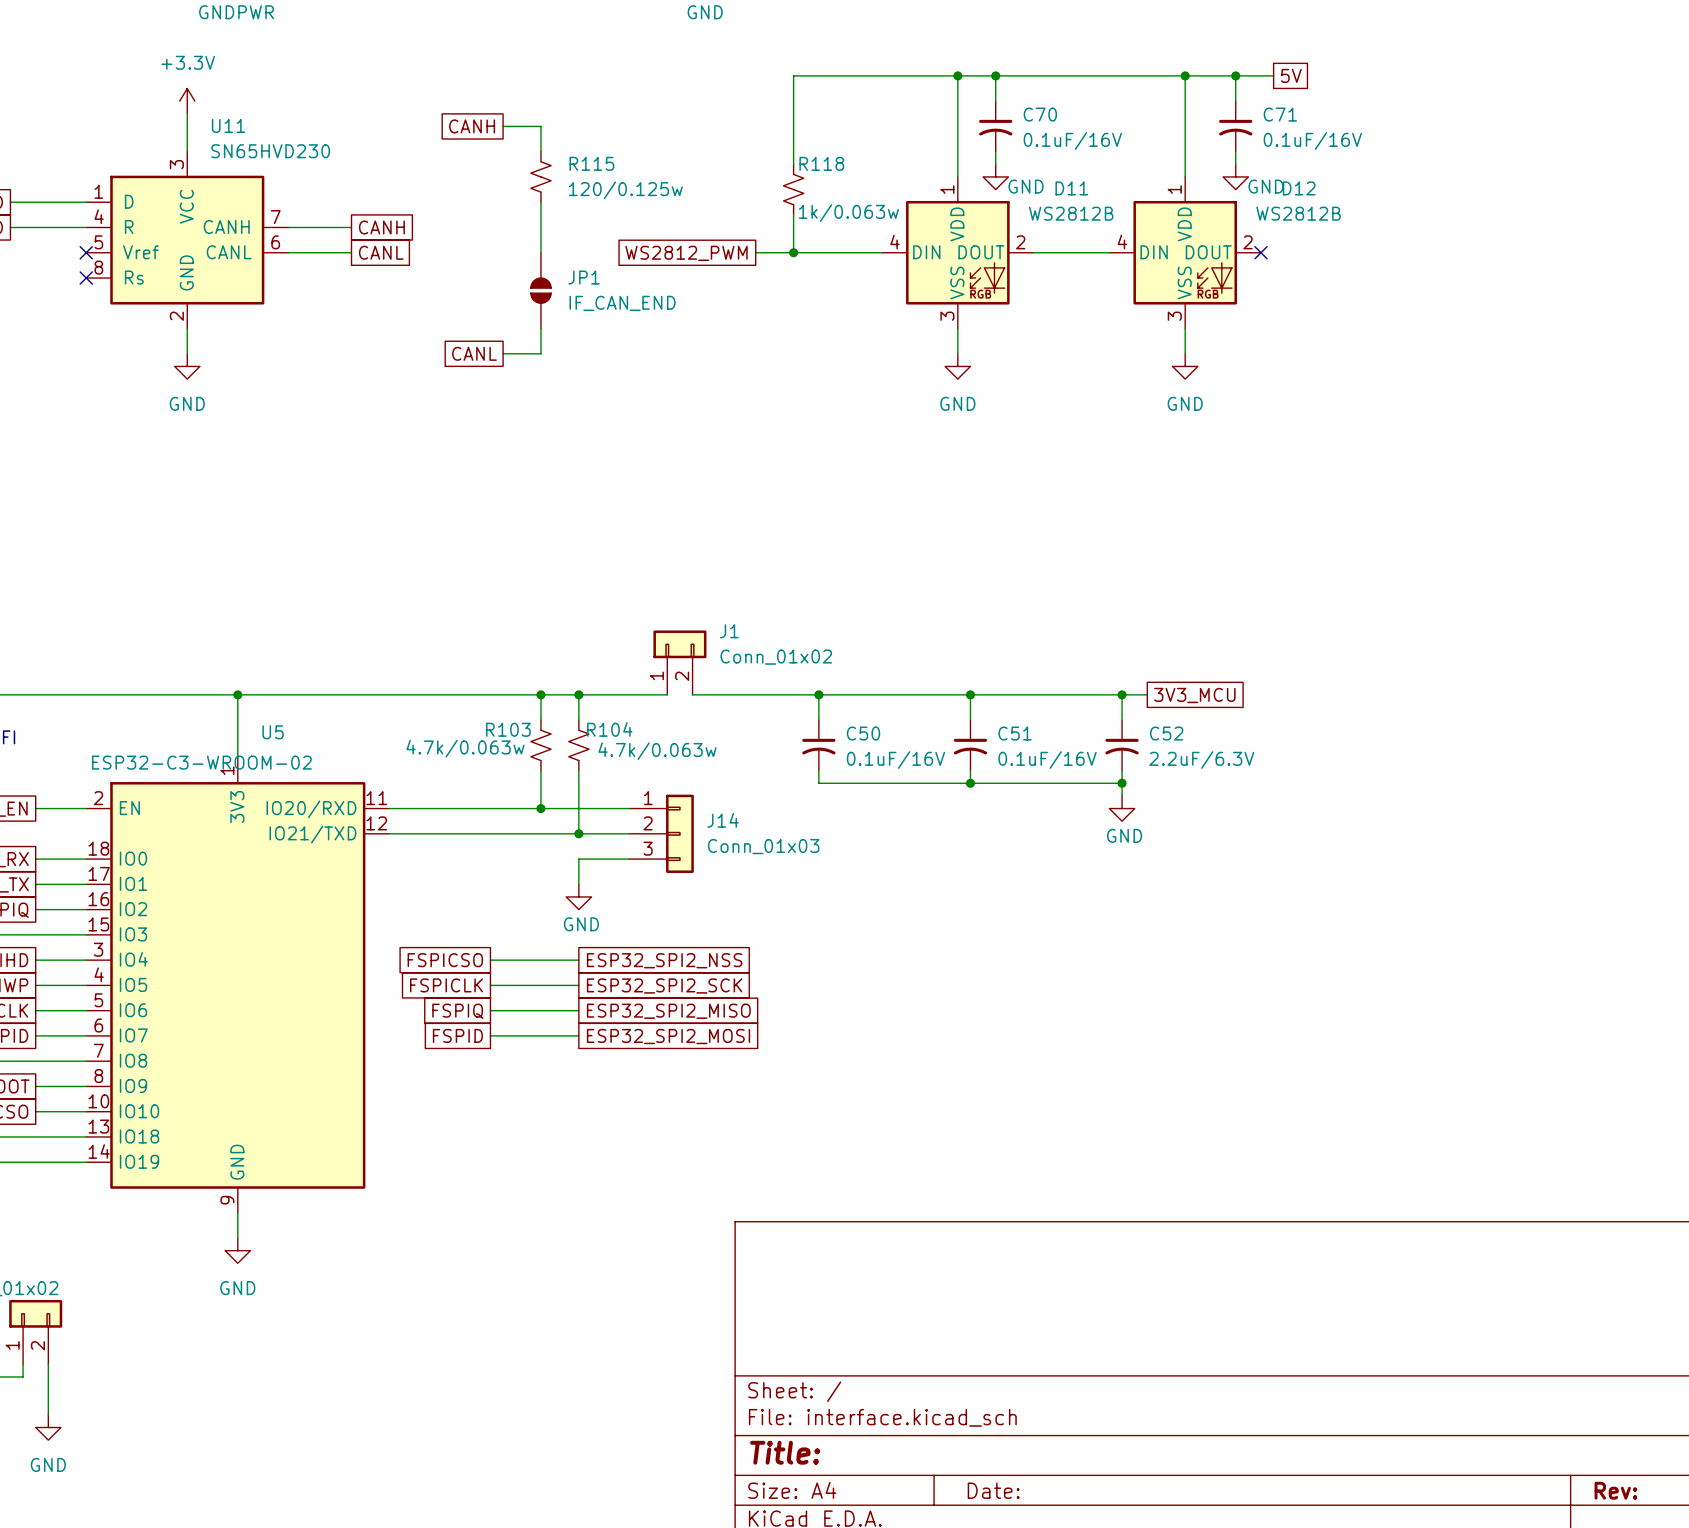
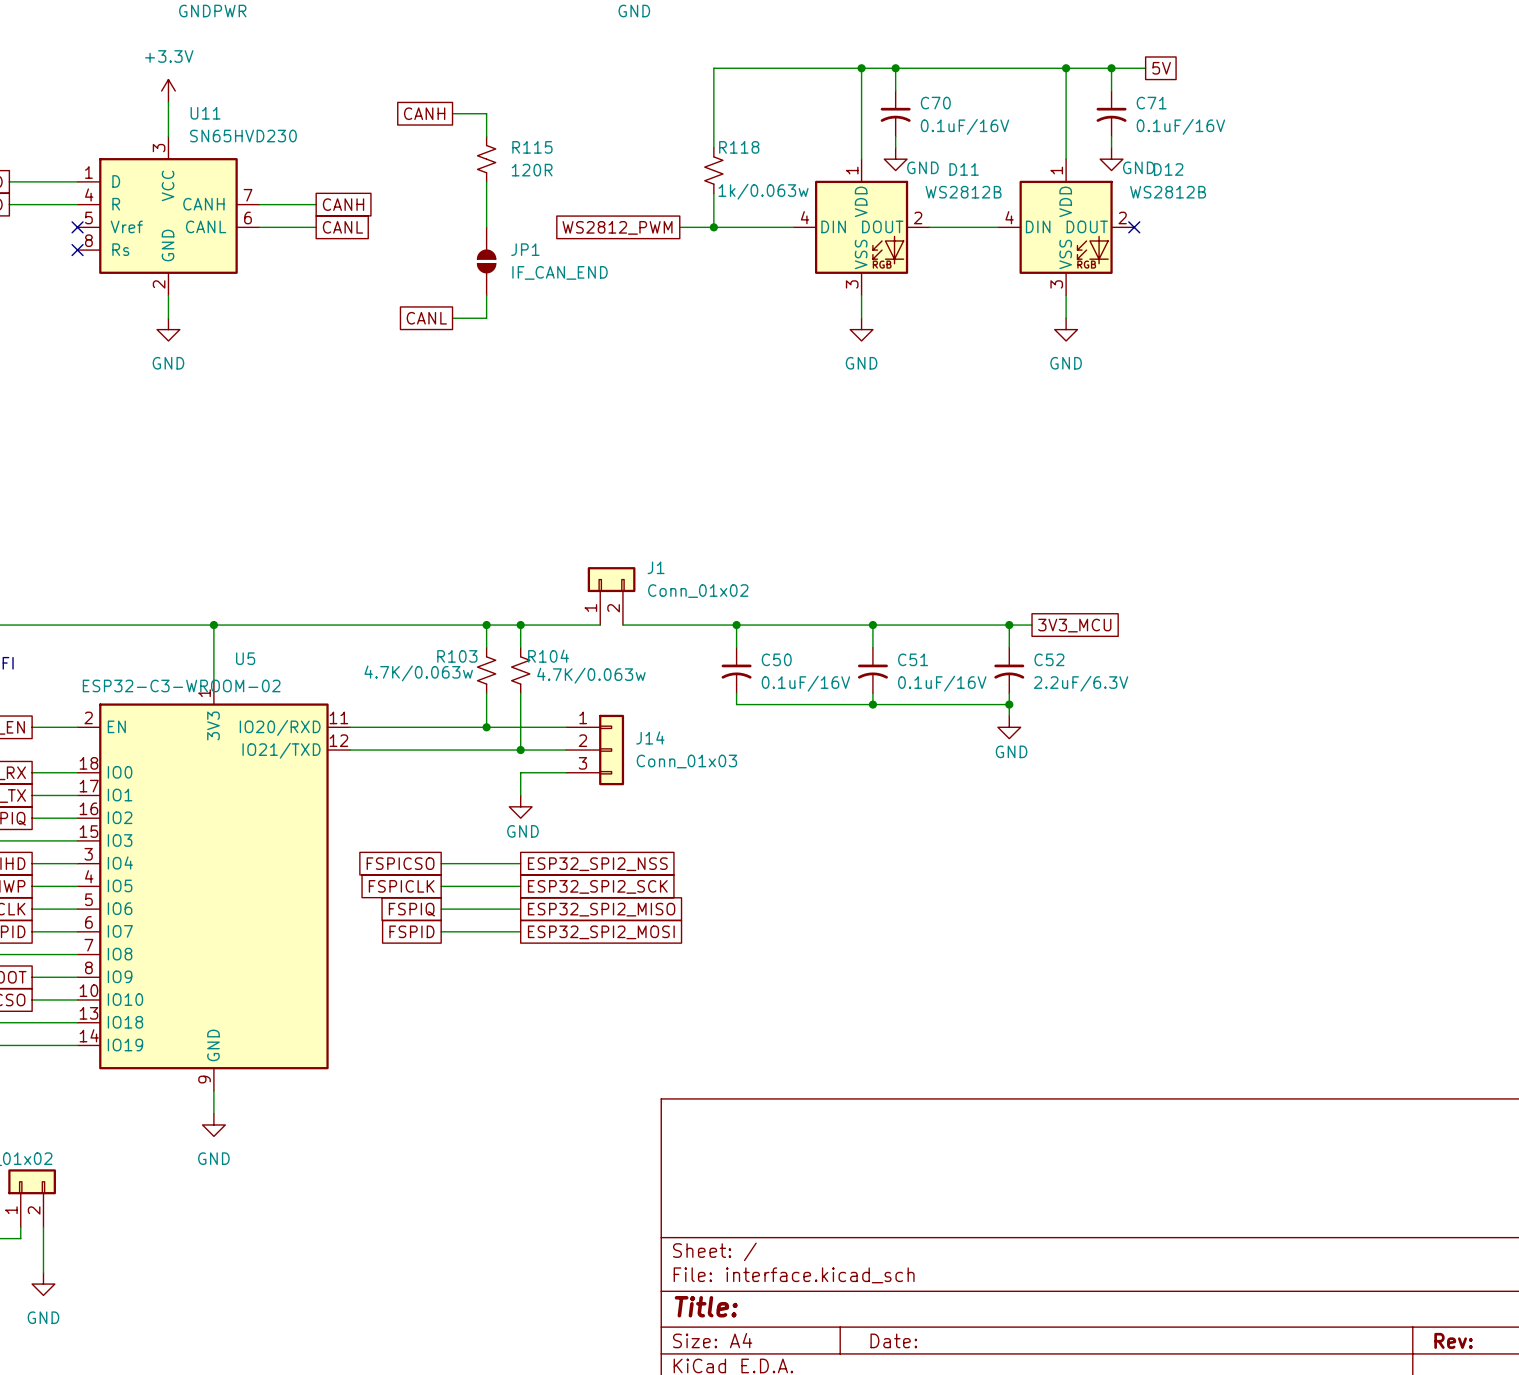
R115 value: 120/0.125w (625, 190) -> 120R (532, 170)
R103 value: 4.7k/0.063w (465, 748) -> 4.7K/0.063w (418, 673)
R104 value: 4.7k/0.063w (657, 751) -> 4.7K/0.063w (591, 675)

